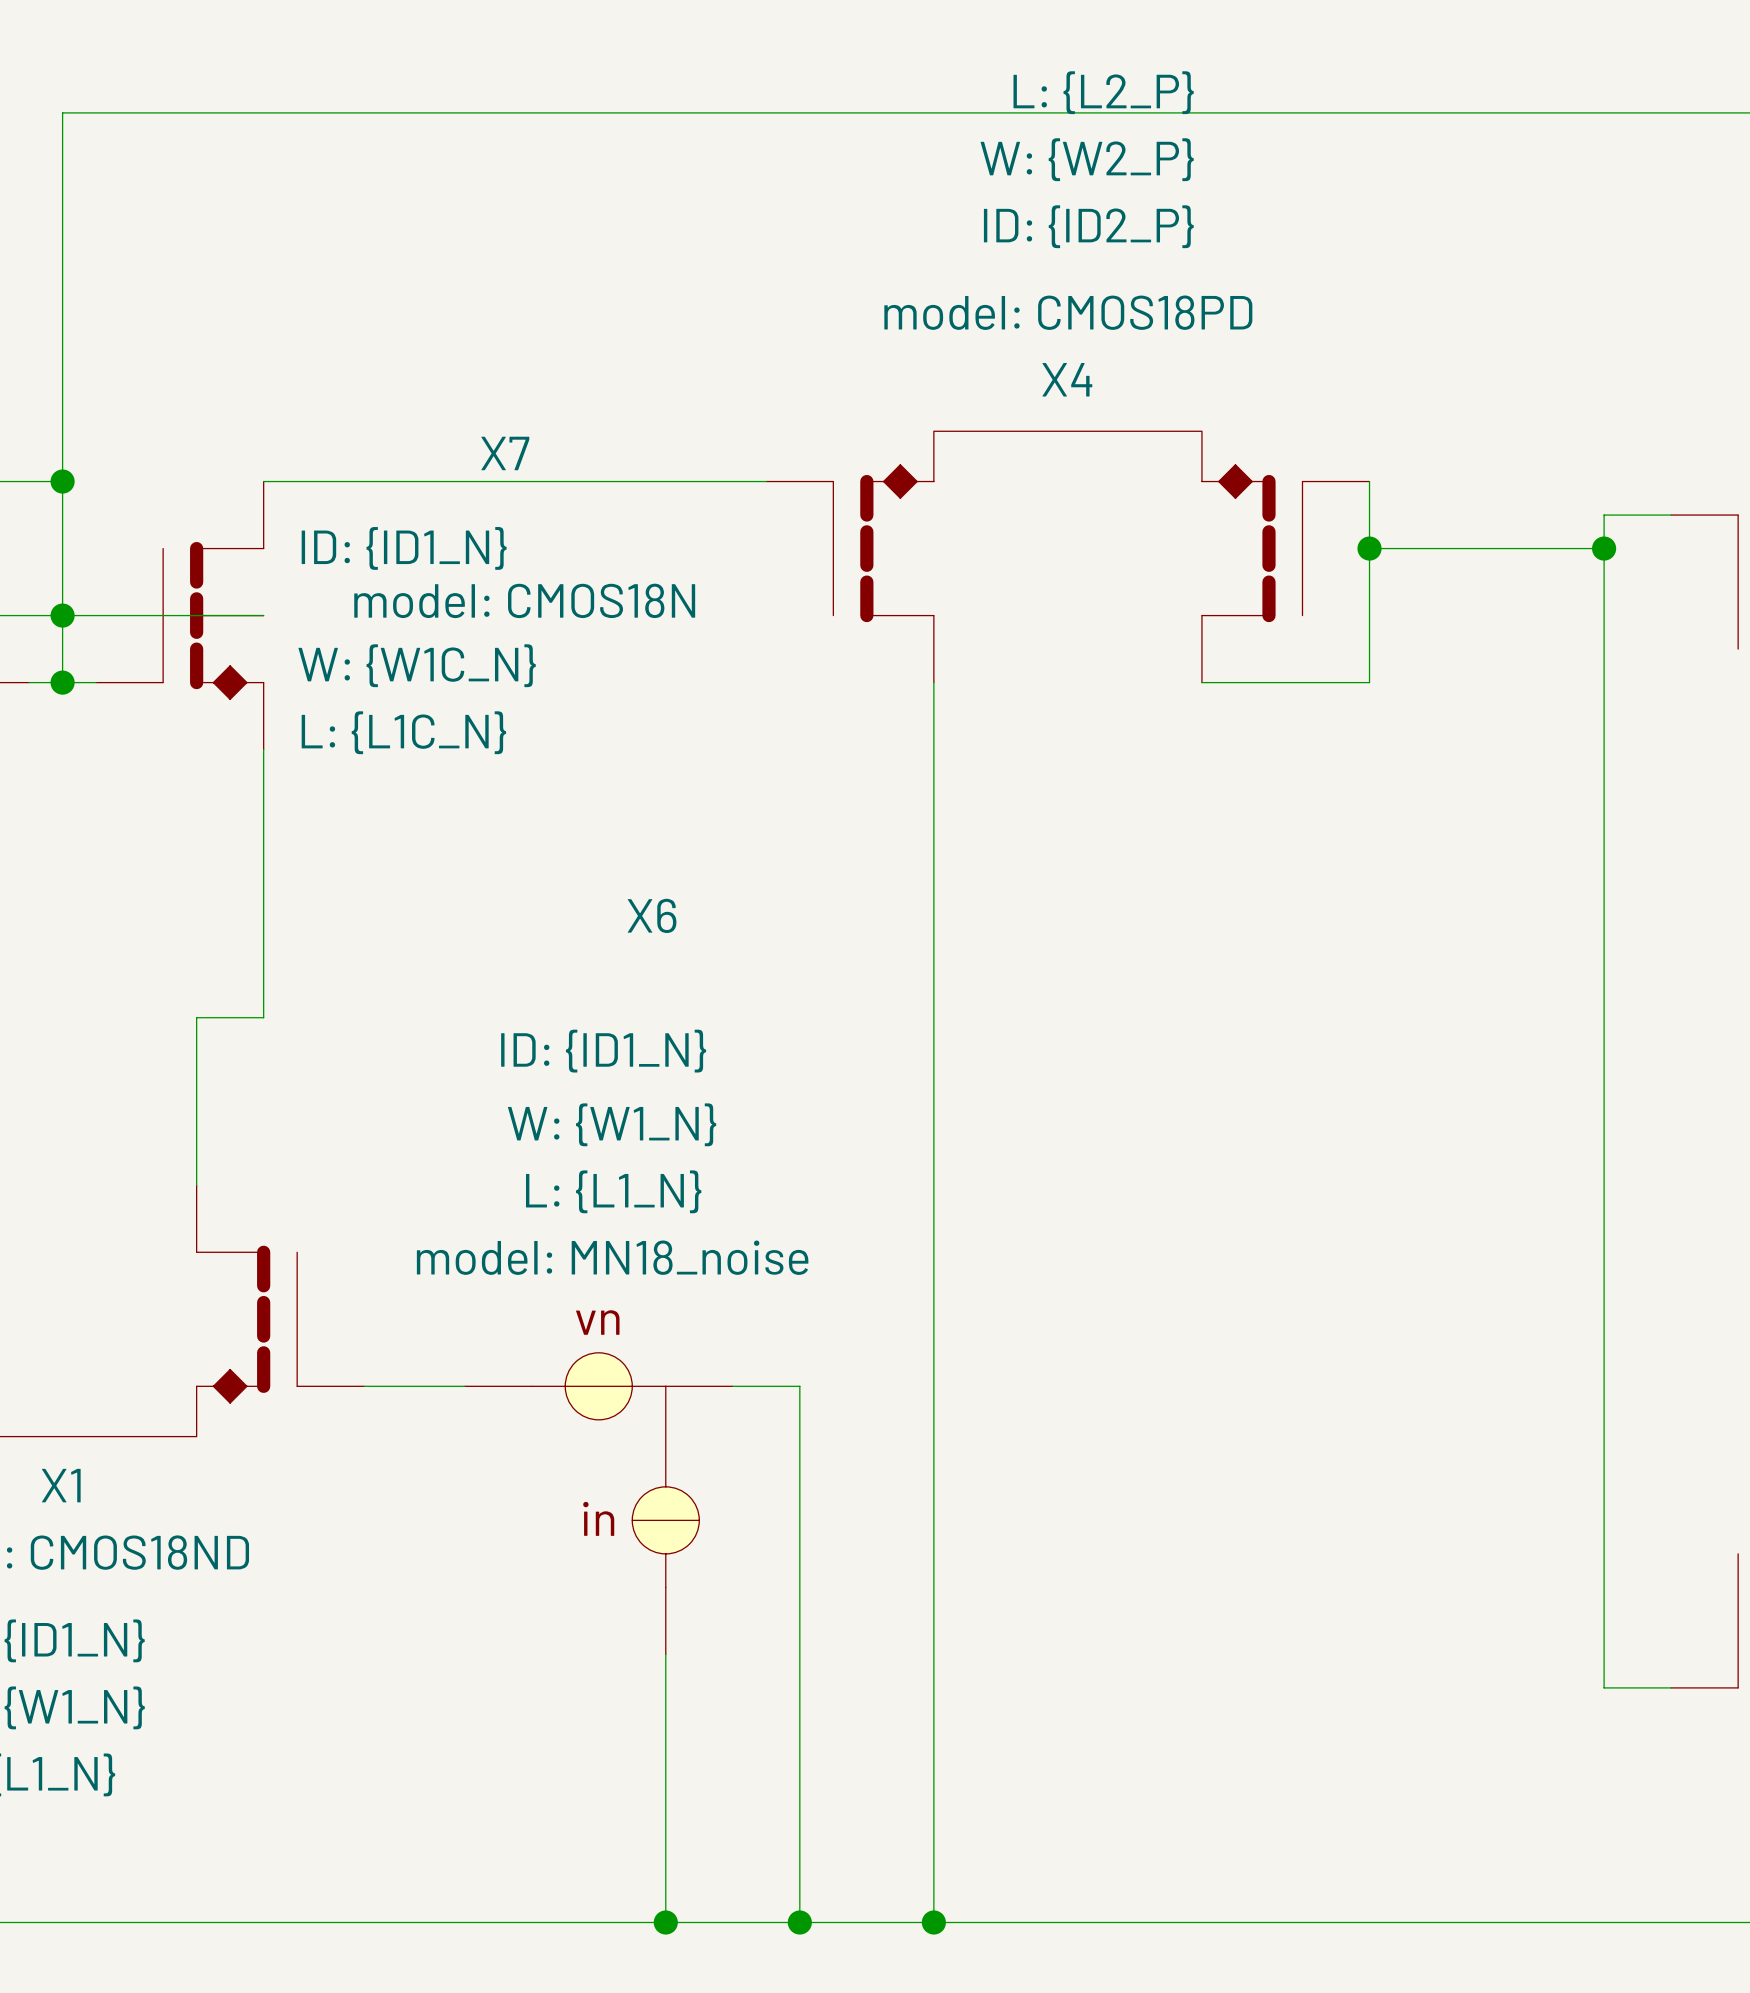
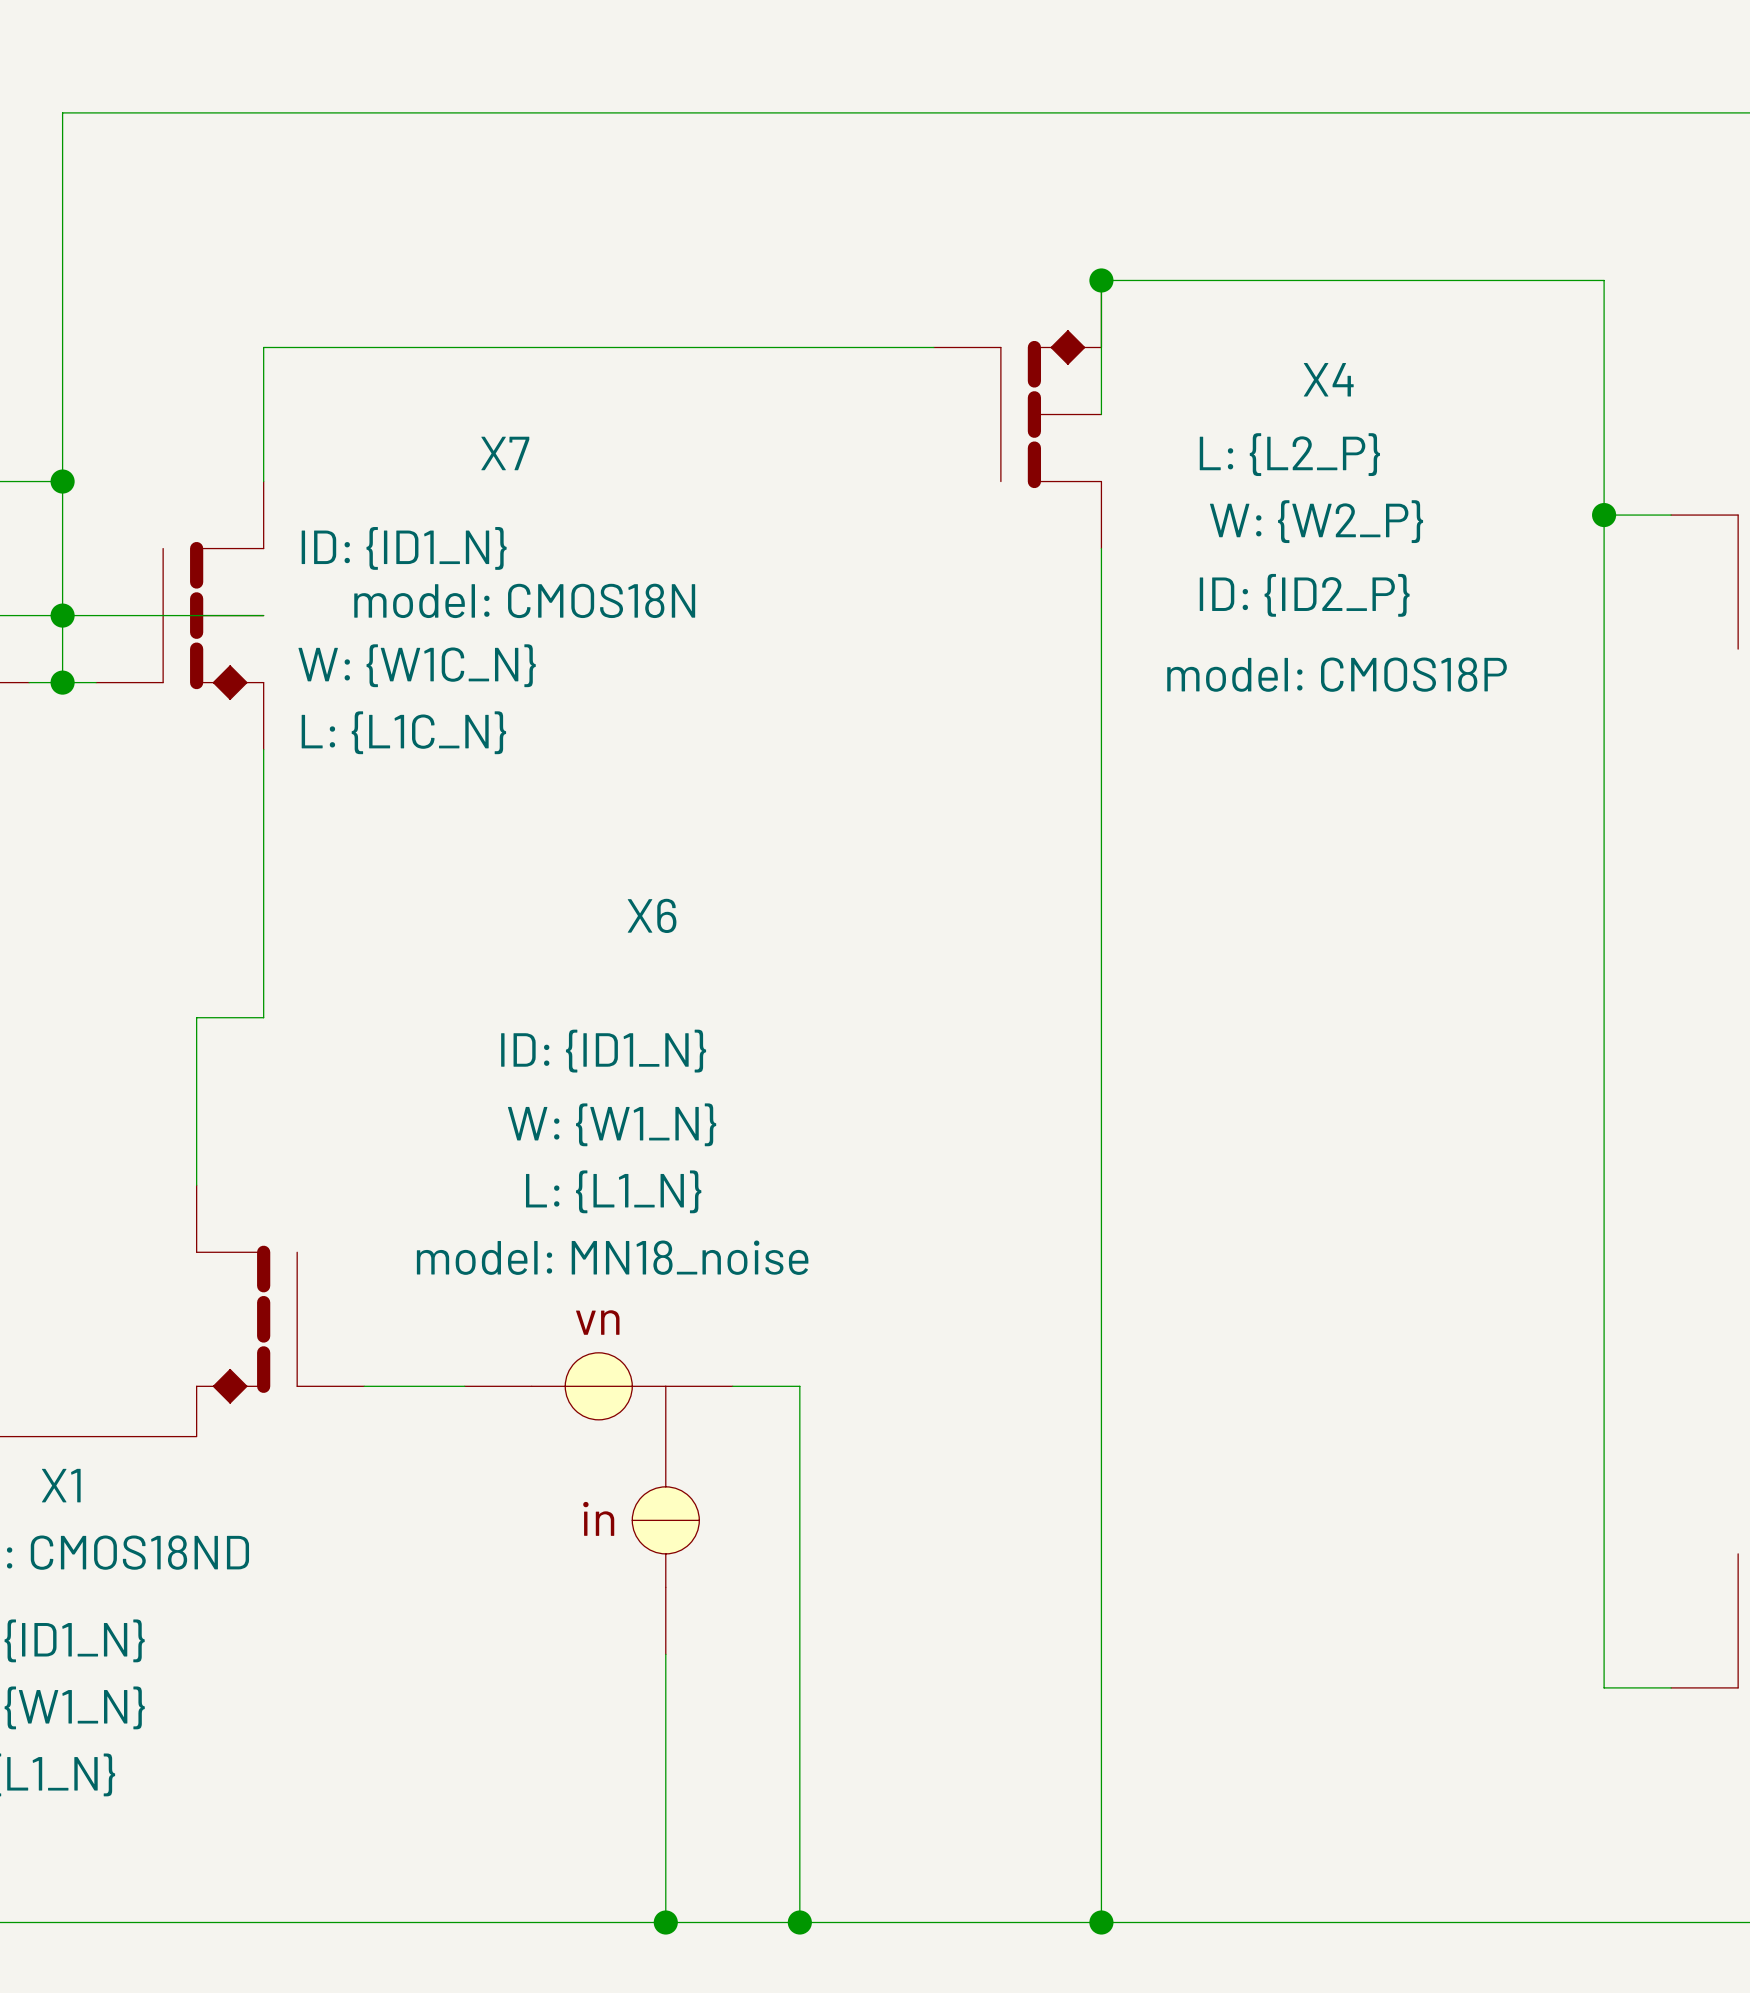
X4 text position: L: {L2_P} (1103, 92) -> L: {L2_P} (1289, 454)
X4 text position: W: {W2_P} (1087, 159) -> W: {W2_P} (1316, 521)
X4 text position: ID: {ID2_P} (1088, 226) -> ID: {ID2_P} (1304, 595)
junction: none -> (1101, 280)
X4 text: model: CMOS18PD (1068, 312) -> model: CMOS18P (1337, 674)
X4 name position: X4 (1067, 379) -> X4 (1328, 379)
wire: none -> (1101, 414) (1101, 280) (1604, 280) (1604, 515)
X4 symbol: [766, 431, 1370, 683] -> [933, 280, 1102, 549]
wire: (263, 481) (766, 481) -> (263, 481) (263, 347) (933, 347)
wire: (1369, 481) (1369, 682) (1201, 682) -> none
wire: none -> (1101, 548) (1101, 1922)
wire: (1369, 548) (1604, 548) -> none
junction: (1369, 548) -> none
junction position: (1604, 548) -> (1604, 515)
wire: (933, 682) (933, 1922) -> none
junction: (933, 1922) -> none
junction: none -> (1101, 1922)

